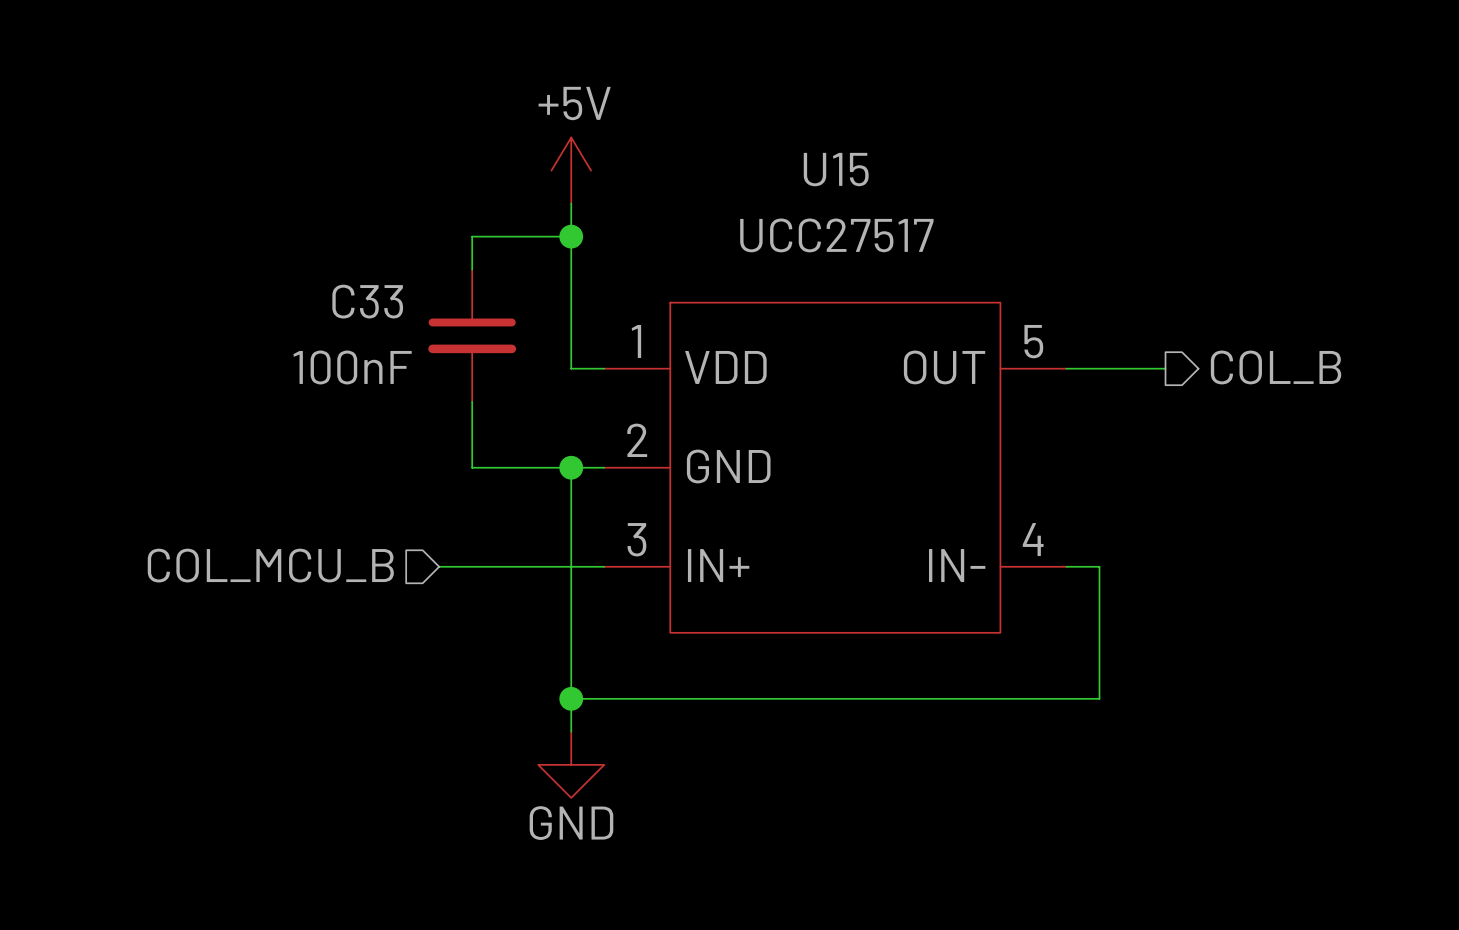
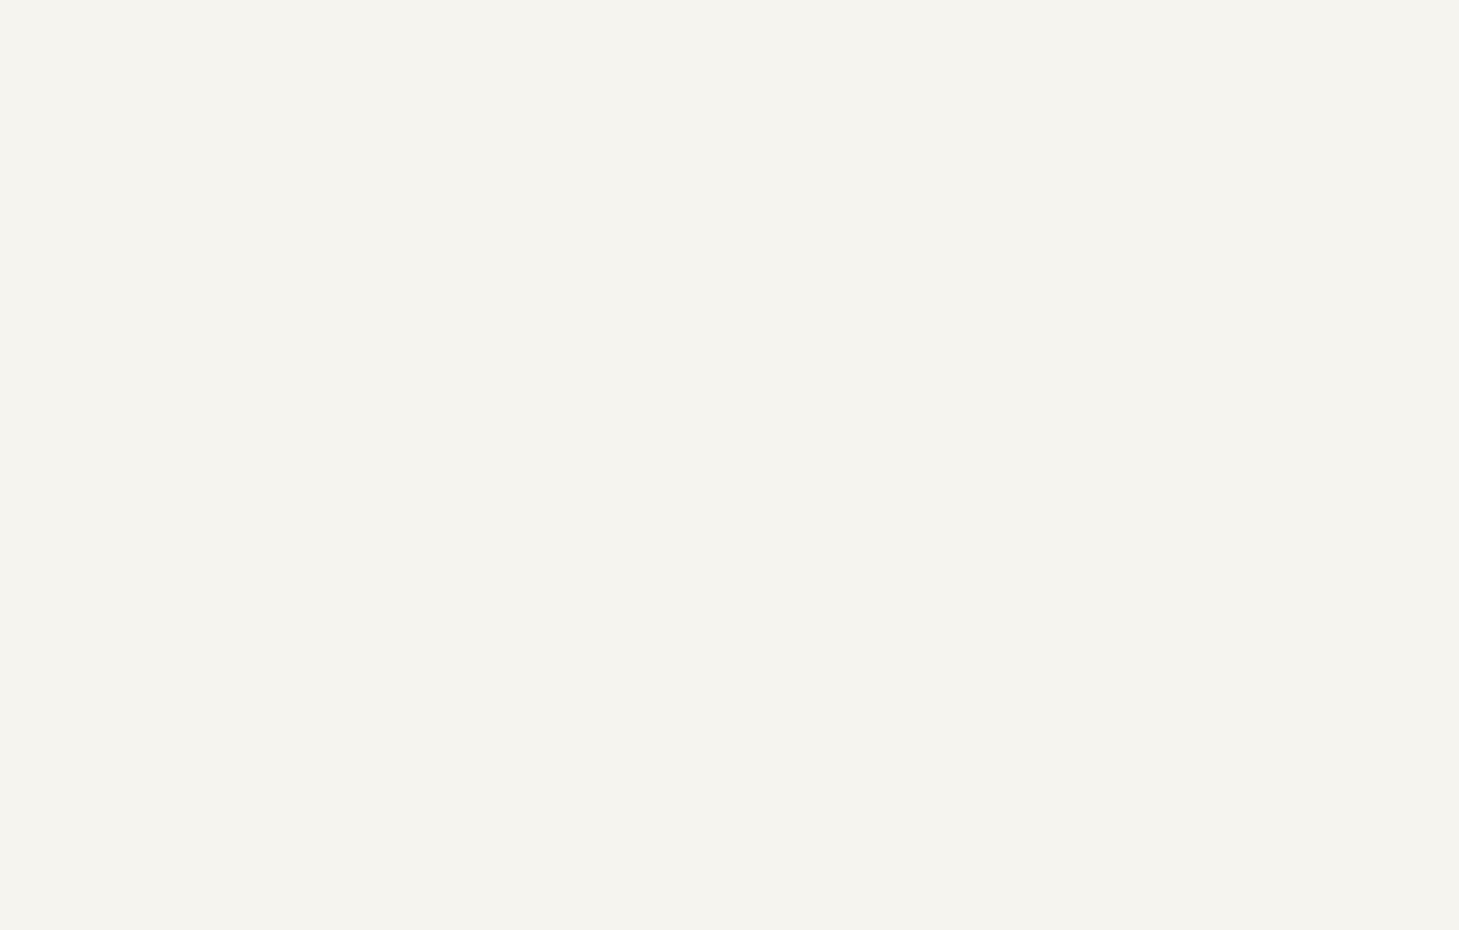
power symbol: +5V (571, 170) -> none
wire: (571, 203) (571, 368) (604, 368) -> none
wire: (571, 236) (472, 236) (472, 269) -> none
junction: (571, 236) -> none
C33: 100nF (472, 335) -> none
hierarchical label: COL_B (1276, 367) -> none
wire: (1066, 368) (1165, 368) -> none
wire: (472, 401) (472, 467) (604, 467) -> none
wire: (571, 467) (571, 731) -> none
junction: (571, 467) -> none
U15: UCC27517 (835, 467) -> none
hierarchical label: COL_MCU_B (270, 565) -> none
wire: (439, 566) (604, 566) -> none
wire: (1066, 566) (1099, 566) (1099, 698) (571, 698) -> none
junction: (571, 698) -> none
power symbol: GND (571, 764) -> none

